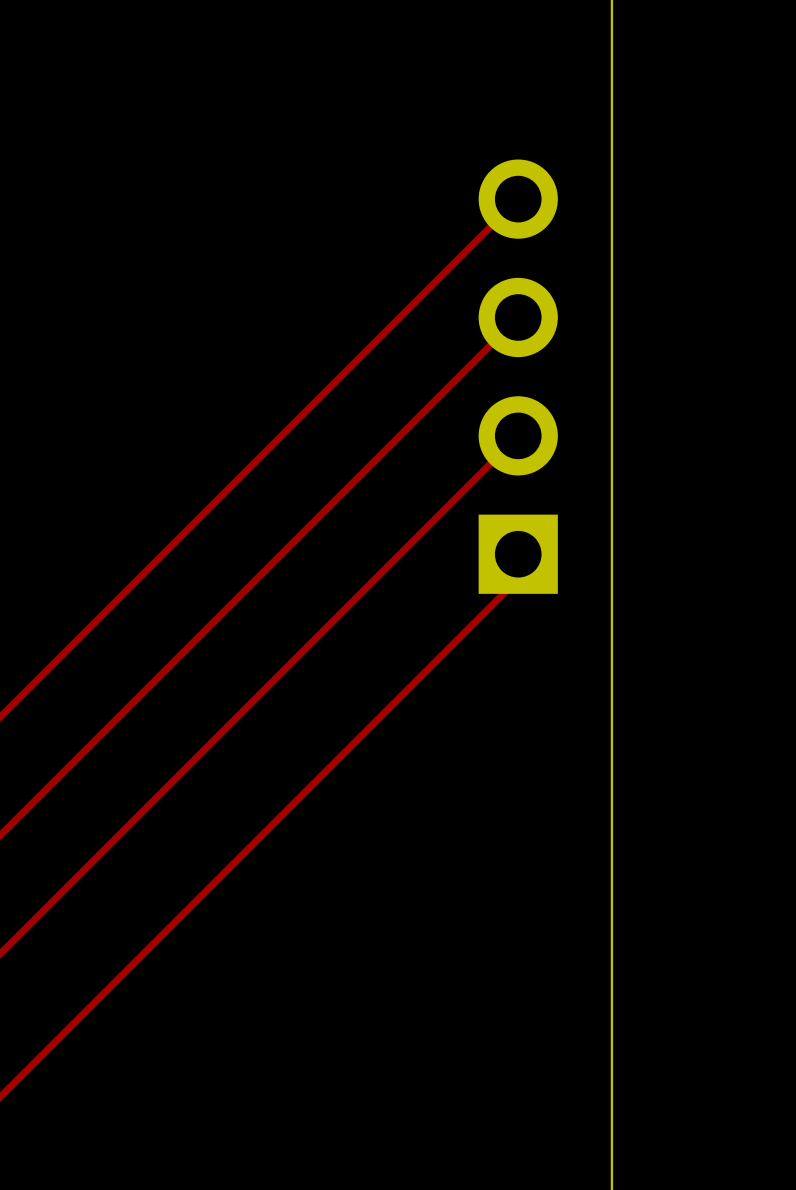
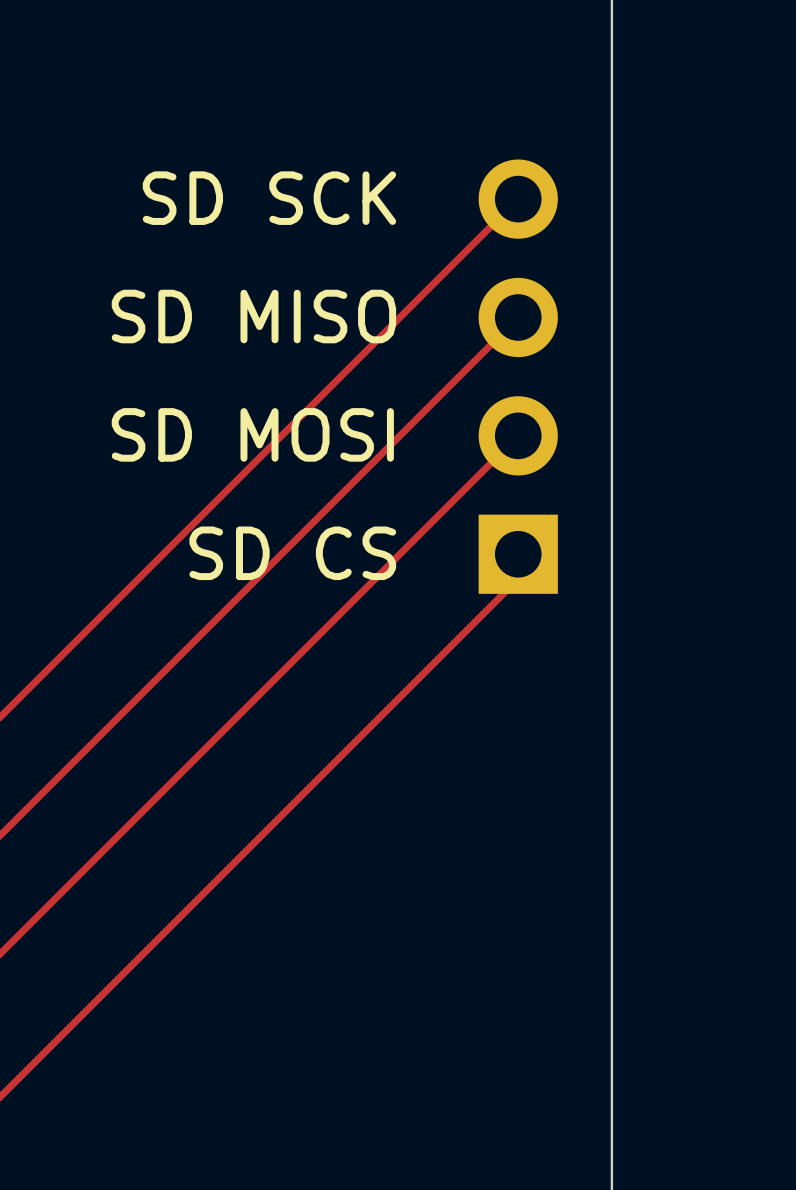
text: none -> SD SCK (269, 198)
text: none -> SD MISO (253, 316)
text: none -> SD MOSI (252, 434)
text: none -> SD CS (292, 553)

